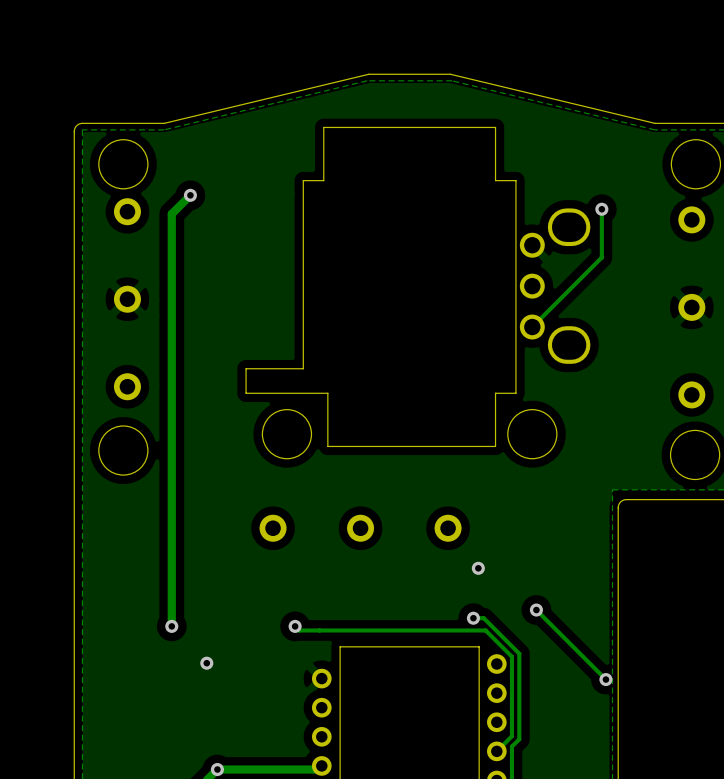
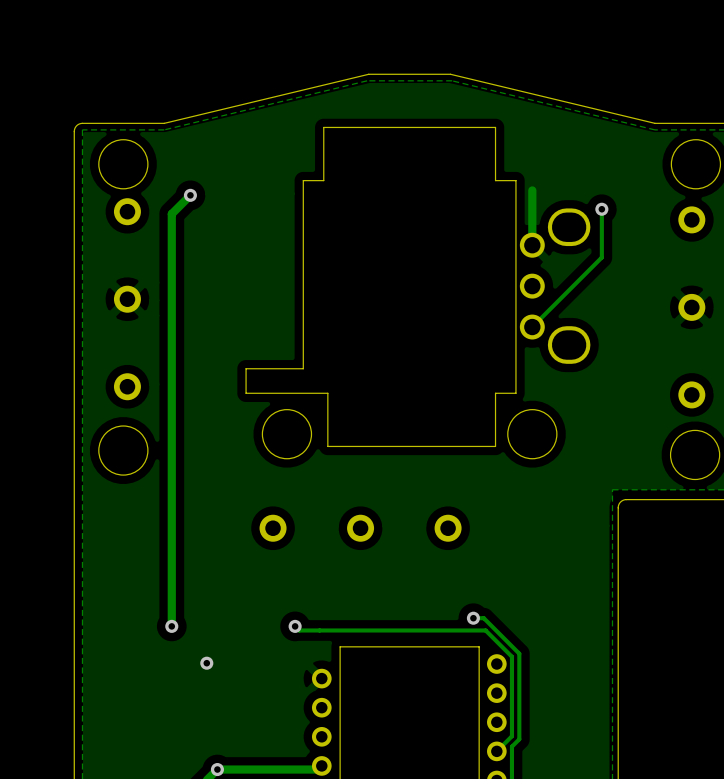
track: none -> (532, 190) (532, 245)
via: (478, 568) -> none
track: (536, 610) (605, 679) -> none
via: (536, 610) -> none
via: (605, 679) -> none

